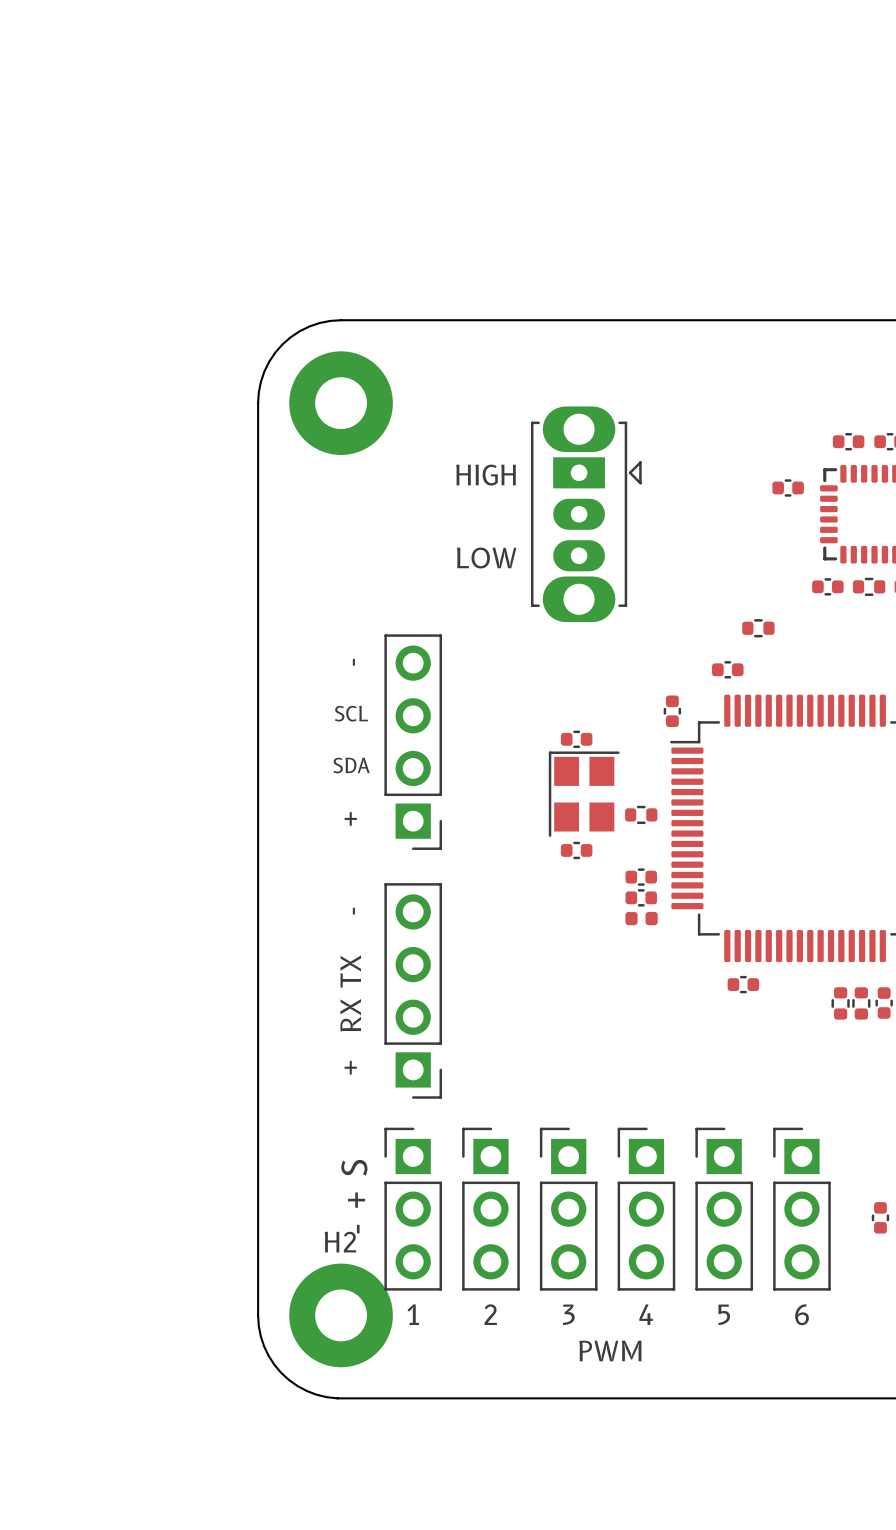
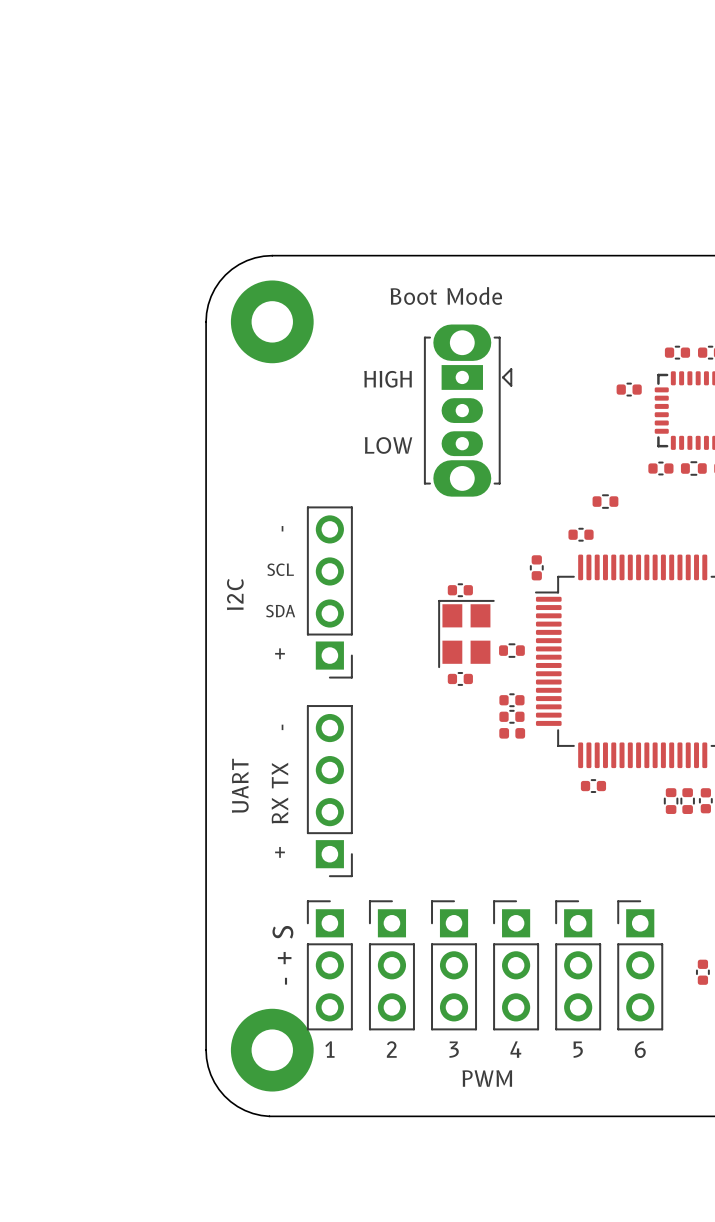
text: none -> Boot Mode (446, 295)
text: none -> I2C (235, 594)
text: none -> UART (240, 785)
H2 name: H2 (340, 1242) -> none

